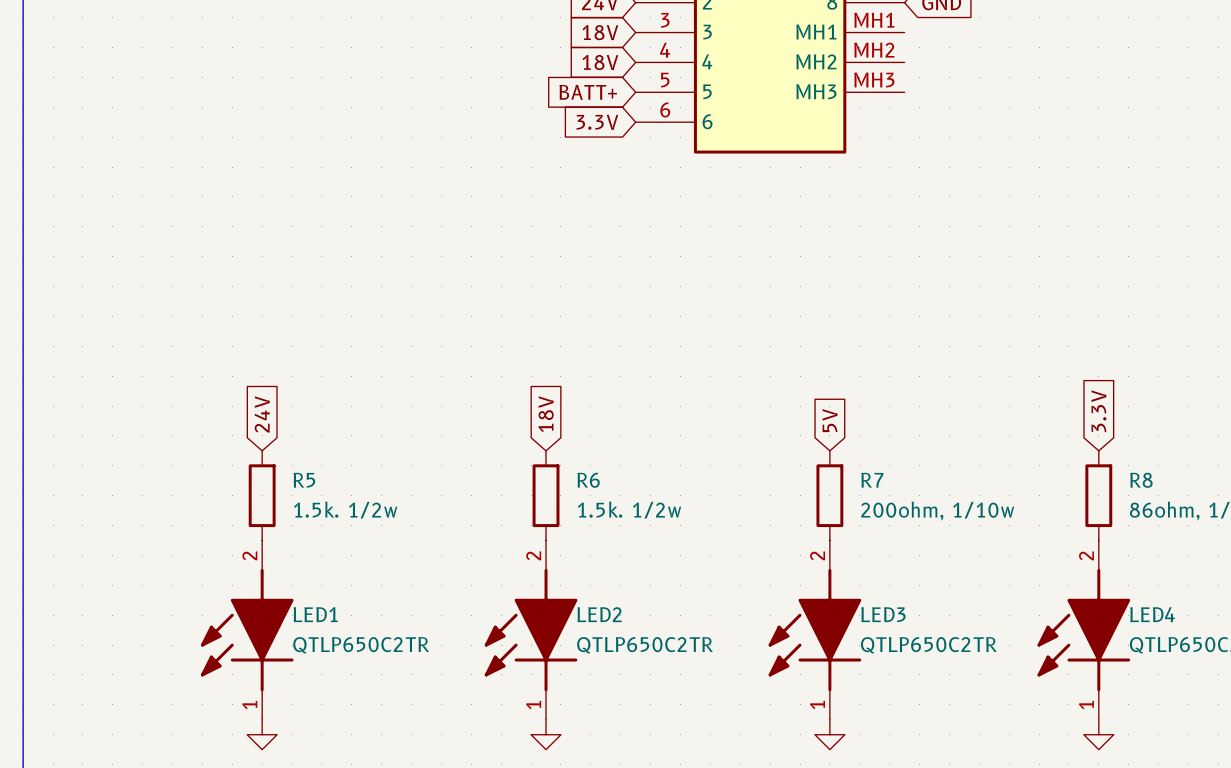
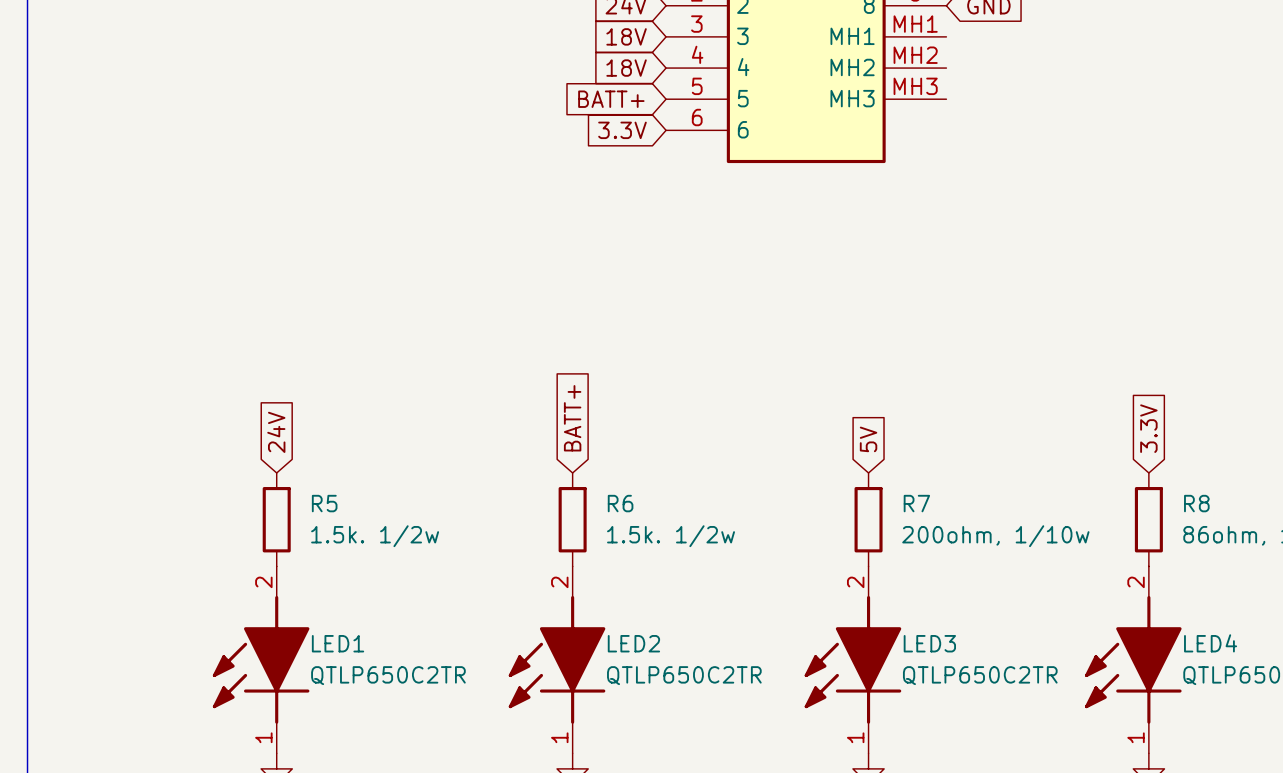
global label: 18V (546, 414) -> BATT+ (572, 418)

